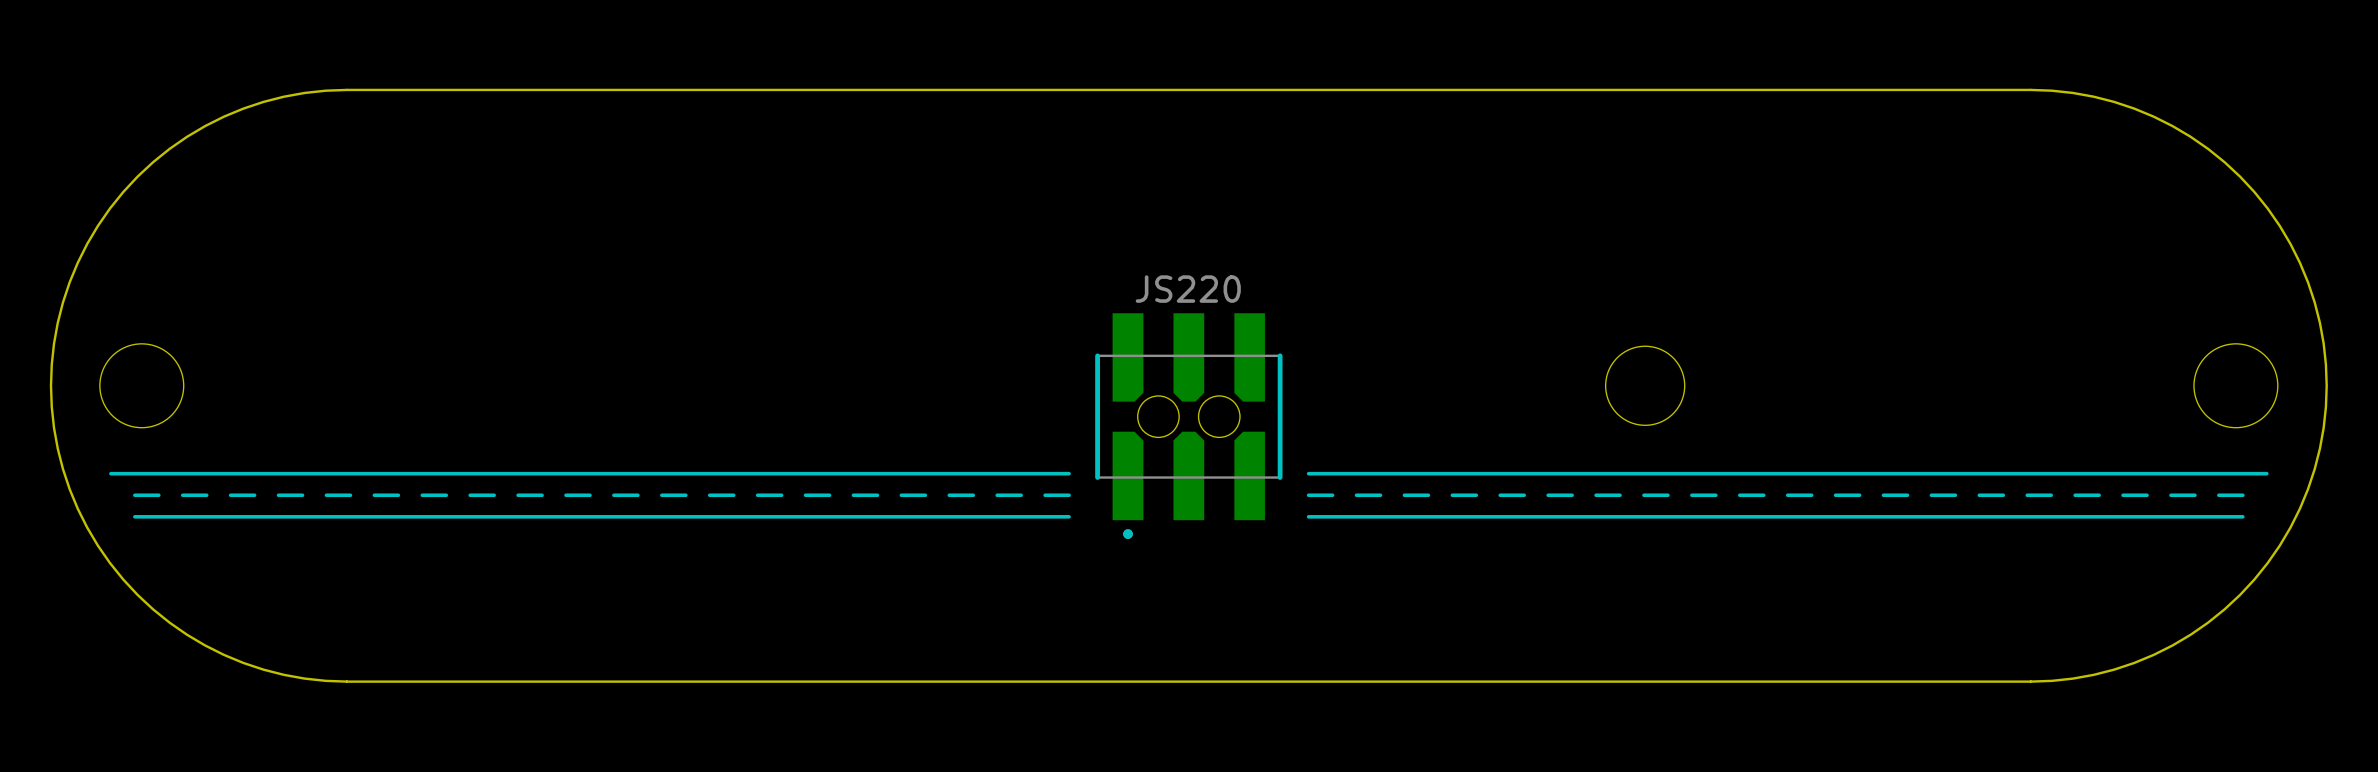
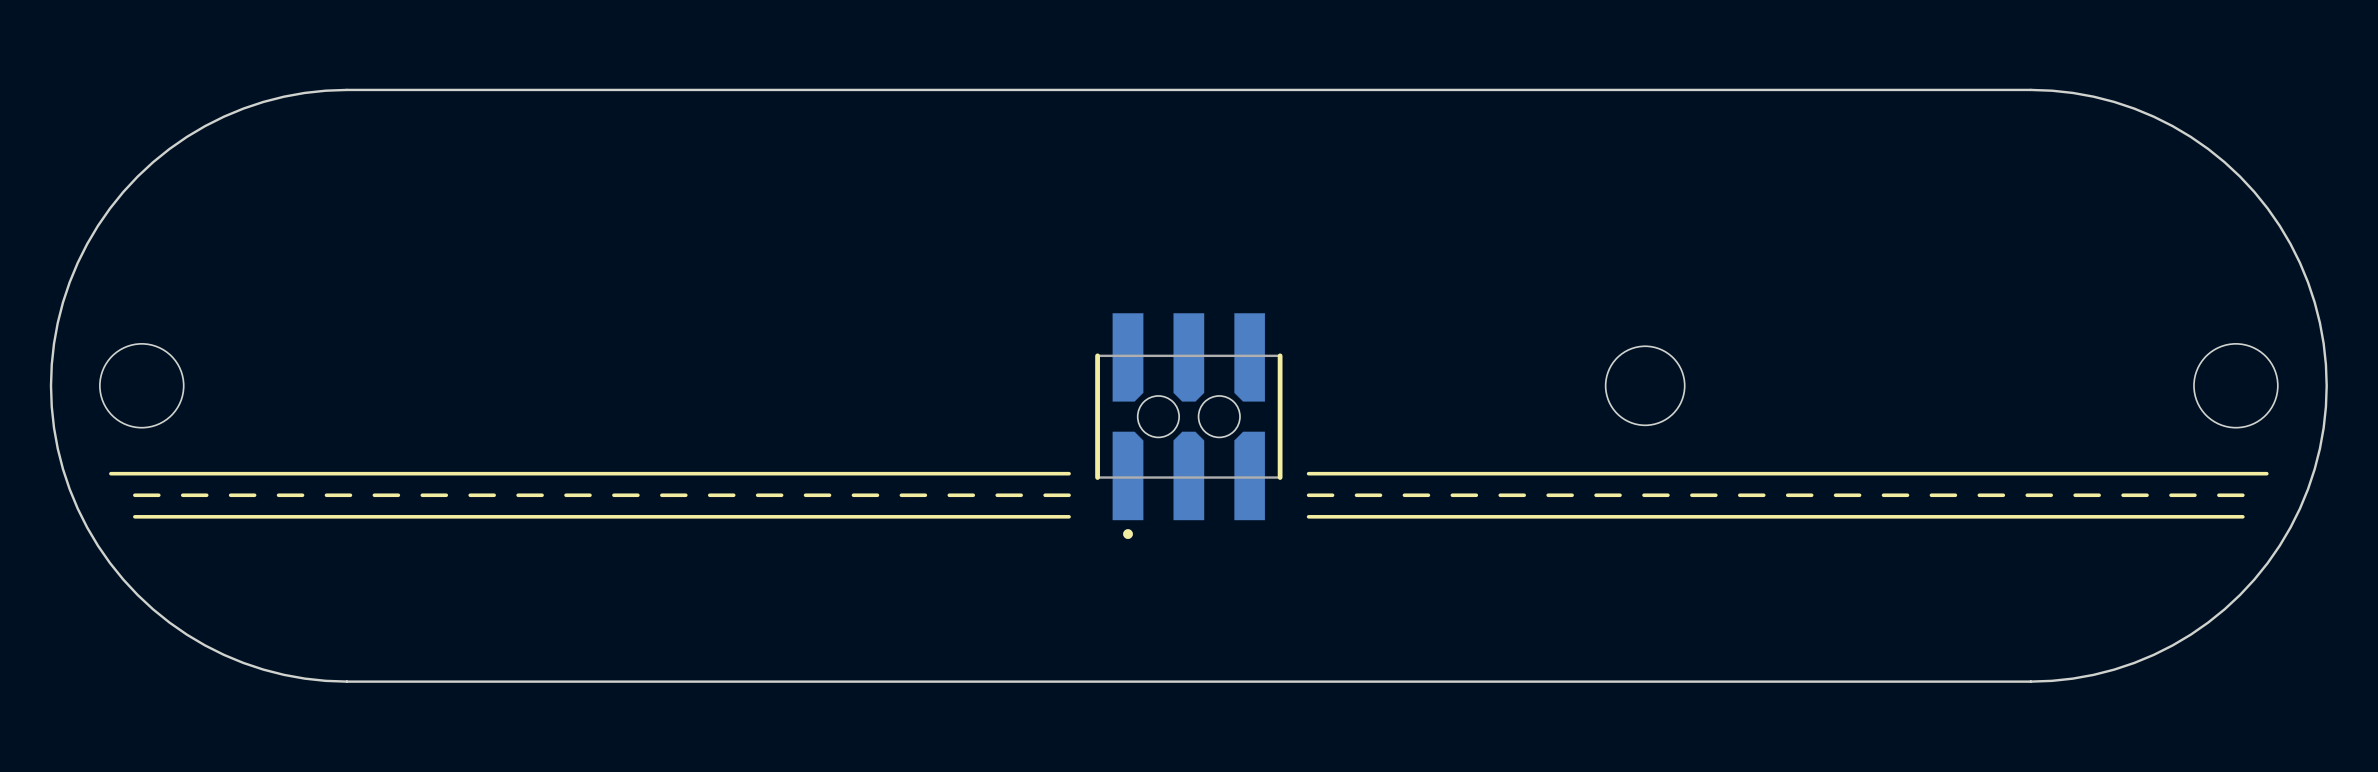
part value: JS220 (1188, 289) -> none

